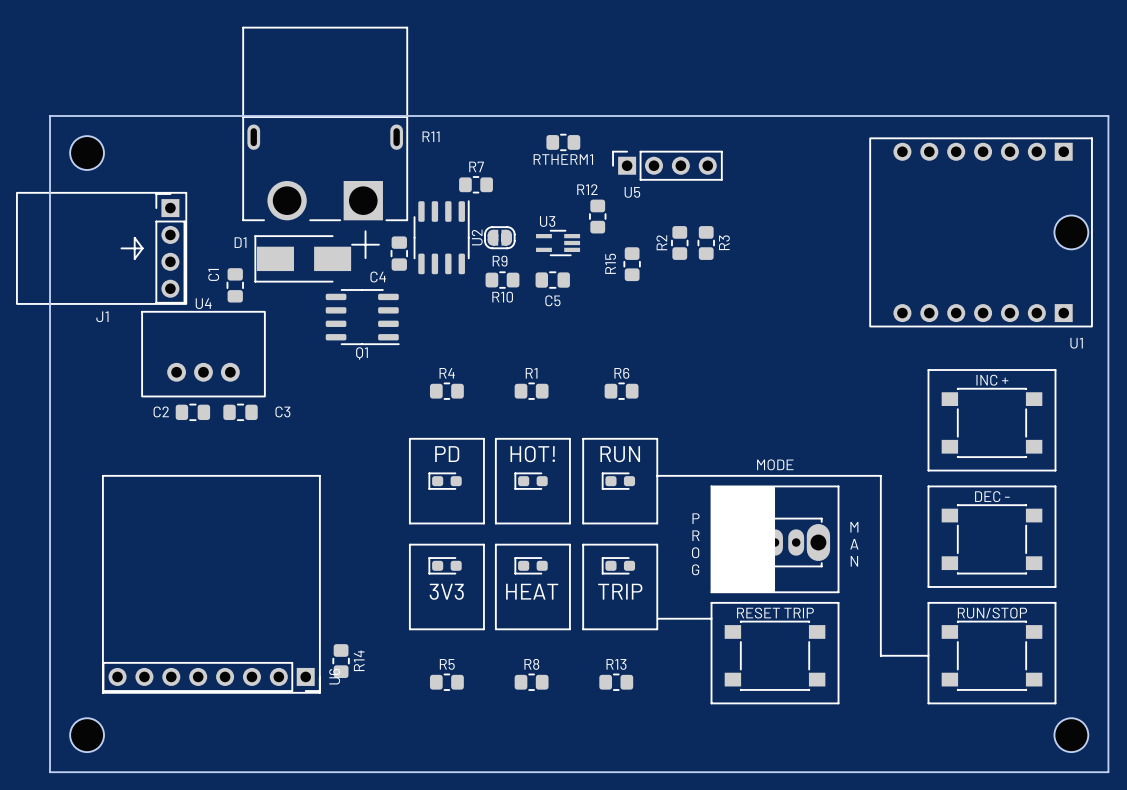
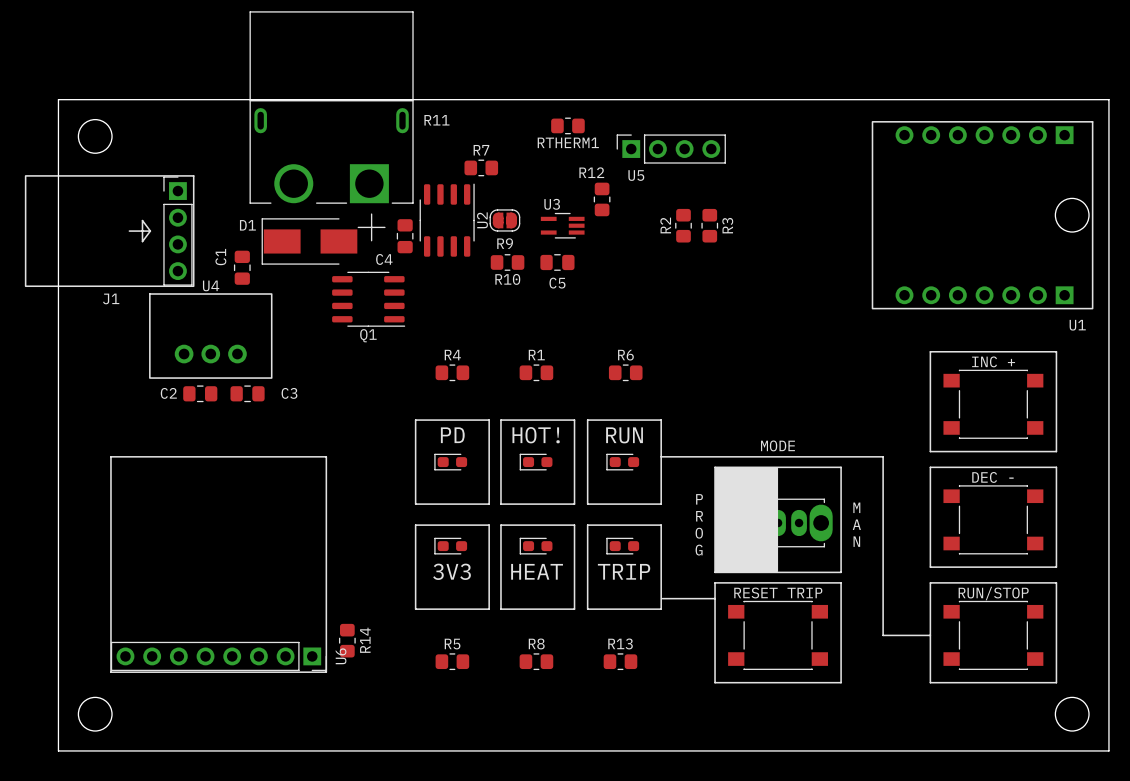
R15: (632, 264) -> none

